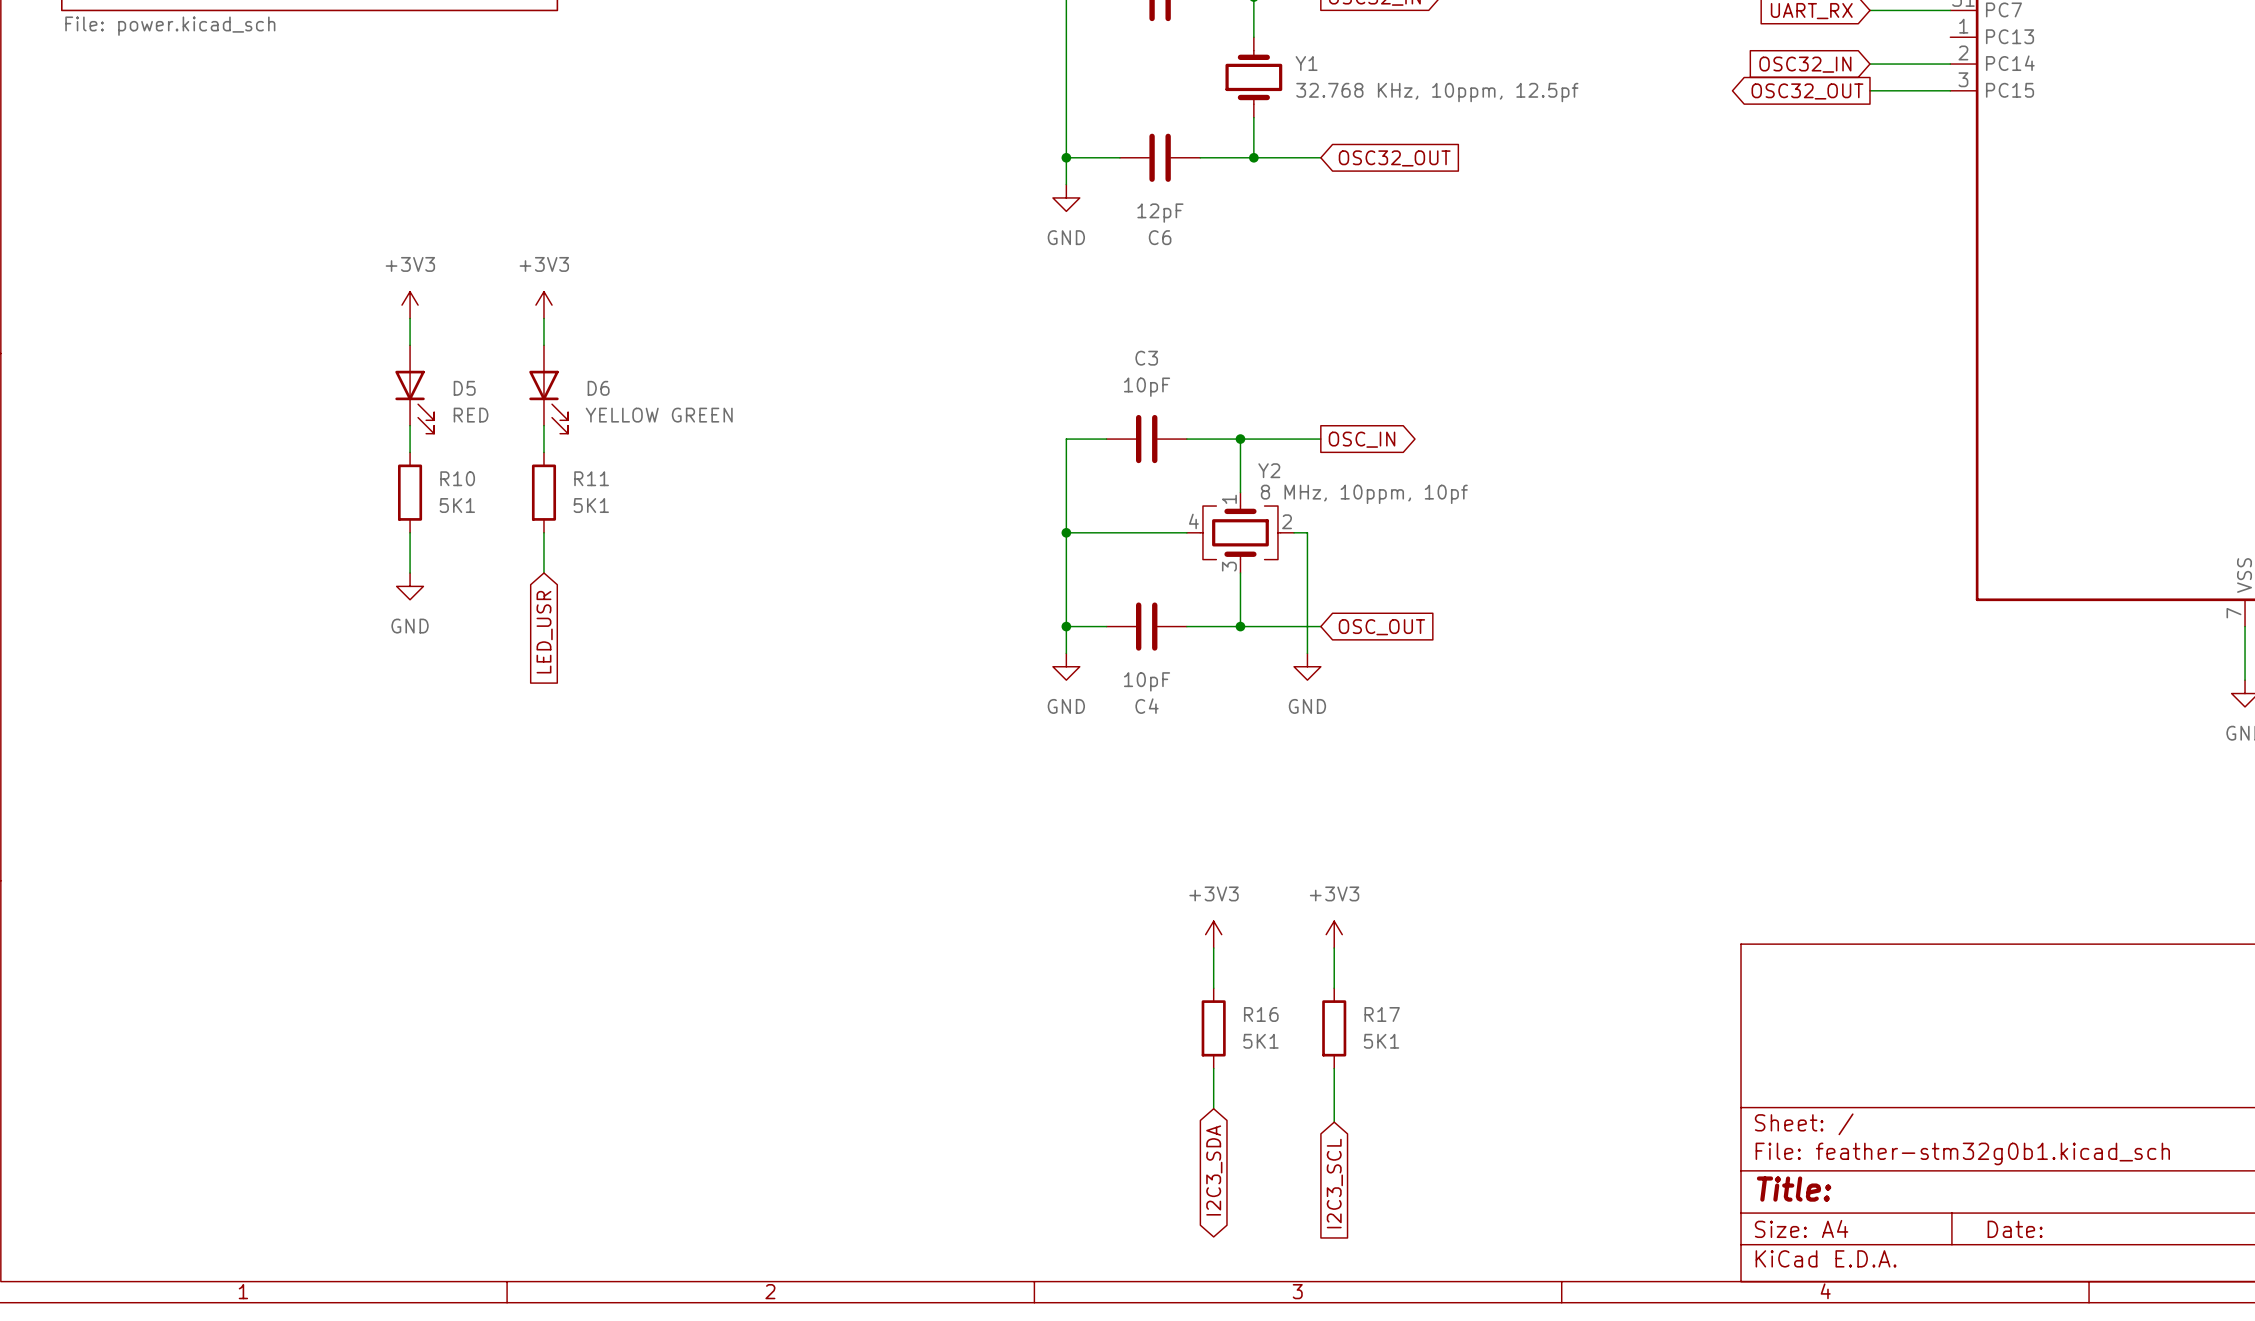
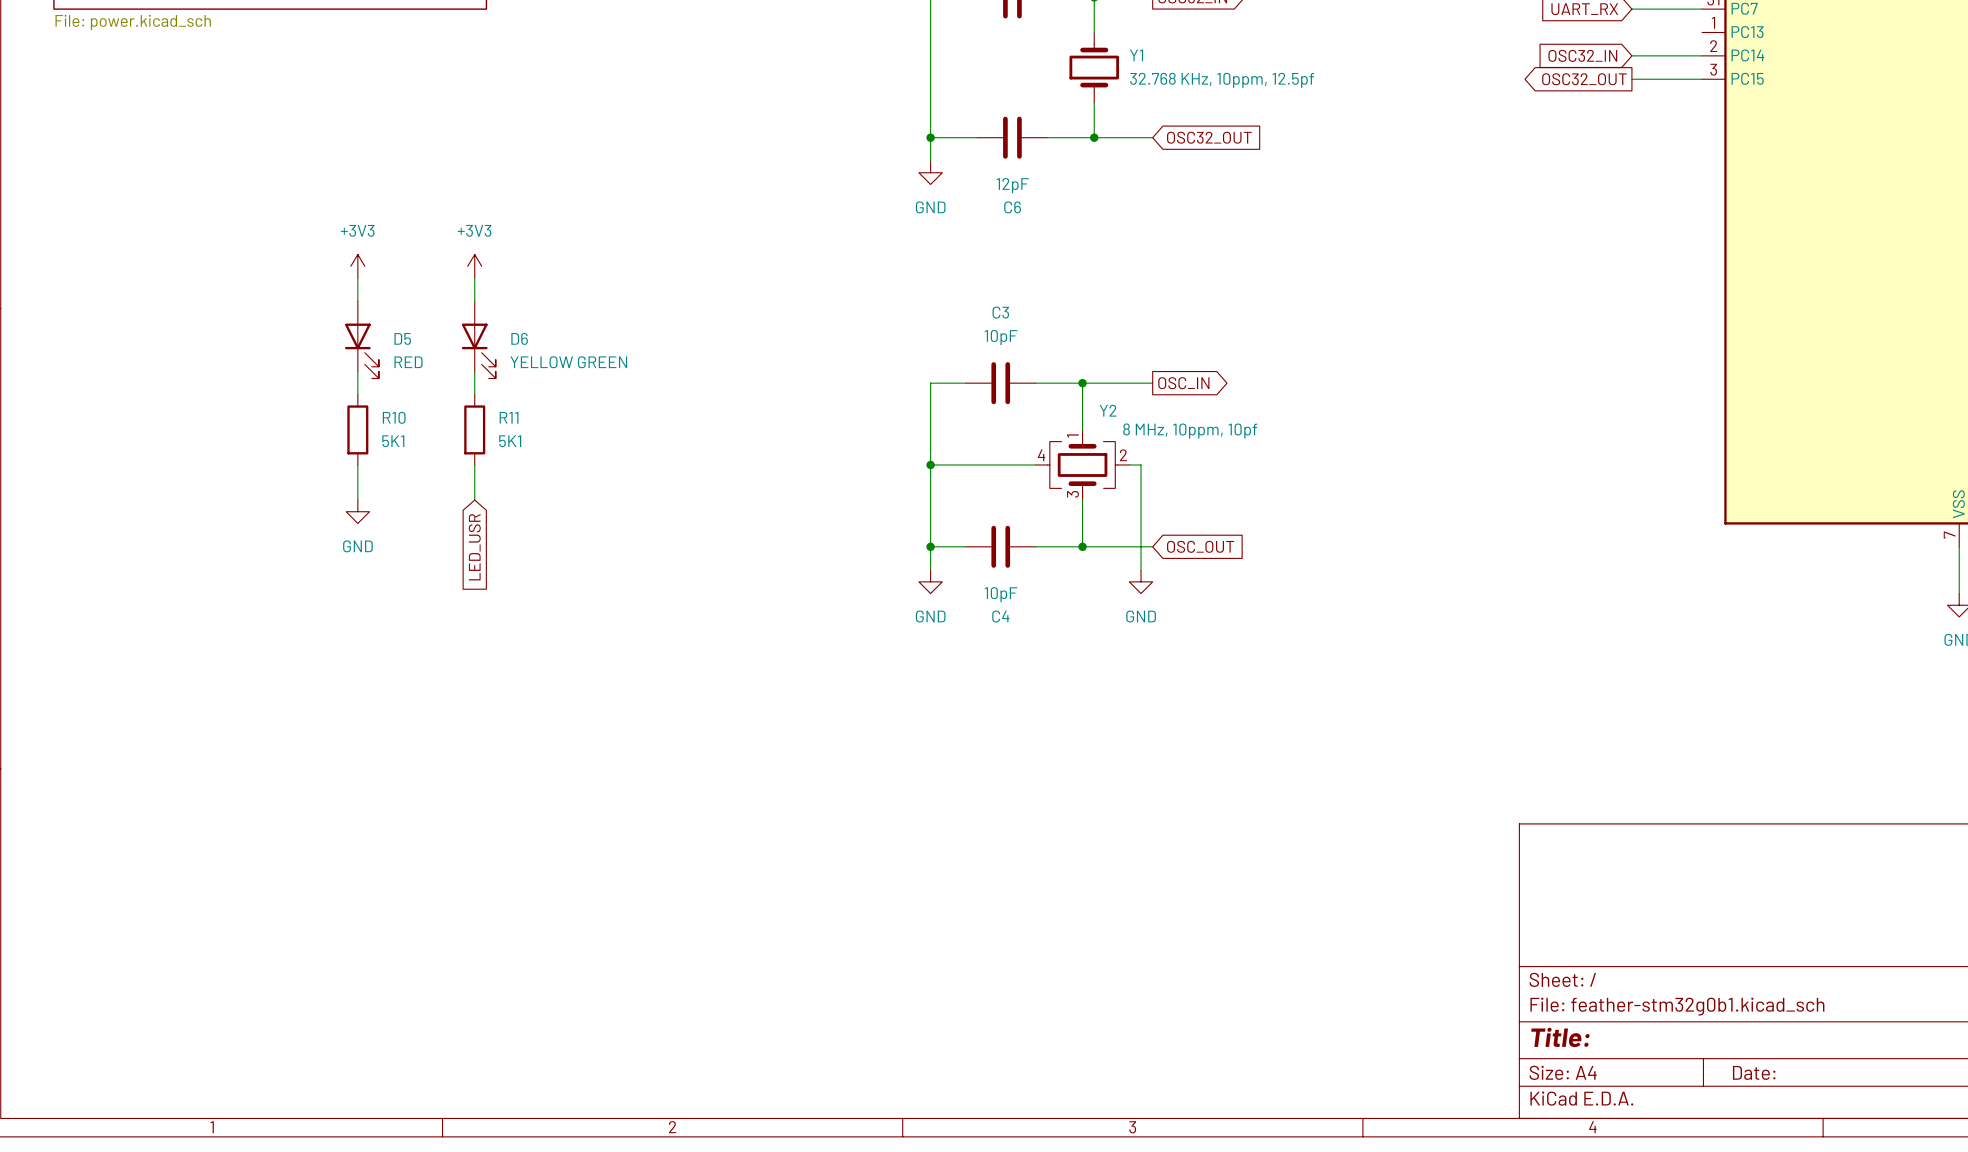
power symbol: +3V3 (1213, 934) -> none
power symbol: +3V3 (1334, 934) -> none
wire: (1213, 948) (1213, 988) -> none
wire: (1334, 948) (1334, 988) -> none
R16: 5K1 (1213, 1028) -> none
R17: 5K1 (1334, 1028) -> none
wire: (1213, 1068) (1213, 1108) -> none
wire: (1334, 1068) (1334, 1122) -> none
global label: I2C3_SDA (1214, 1170) -> none
global label: I2C3_SCL (1334, 1183) -> none

